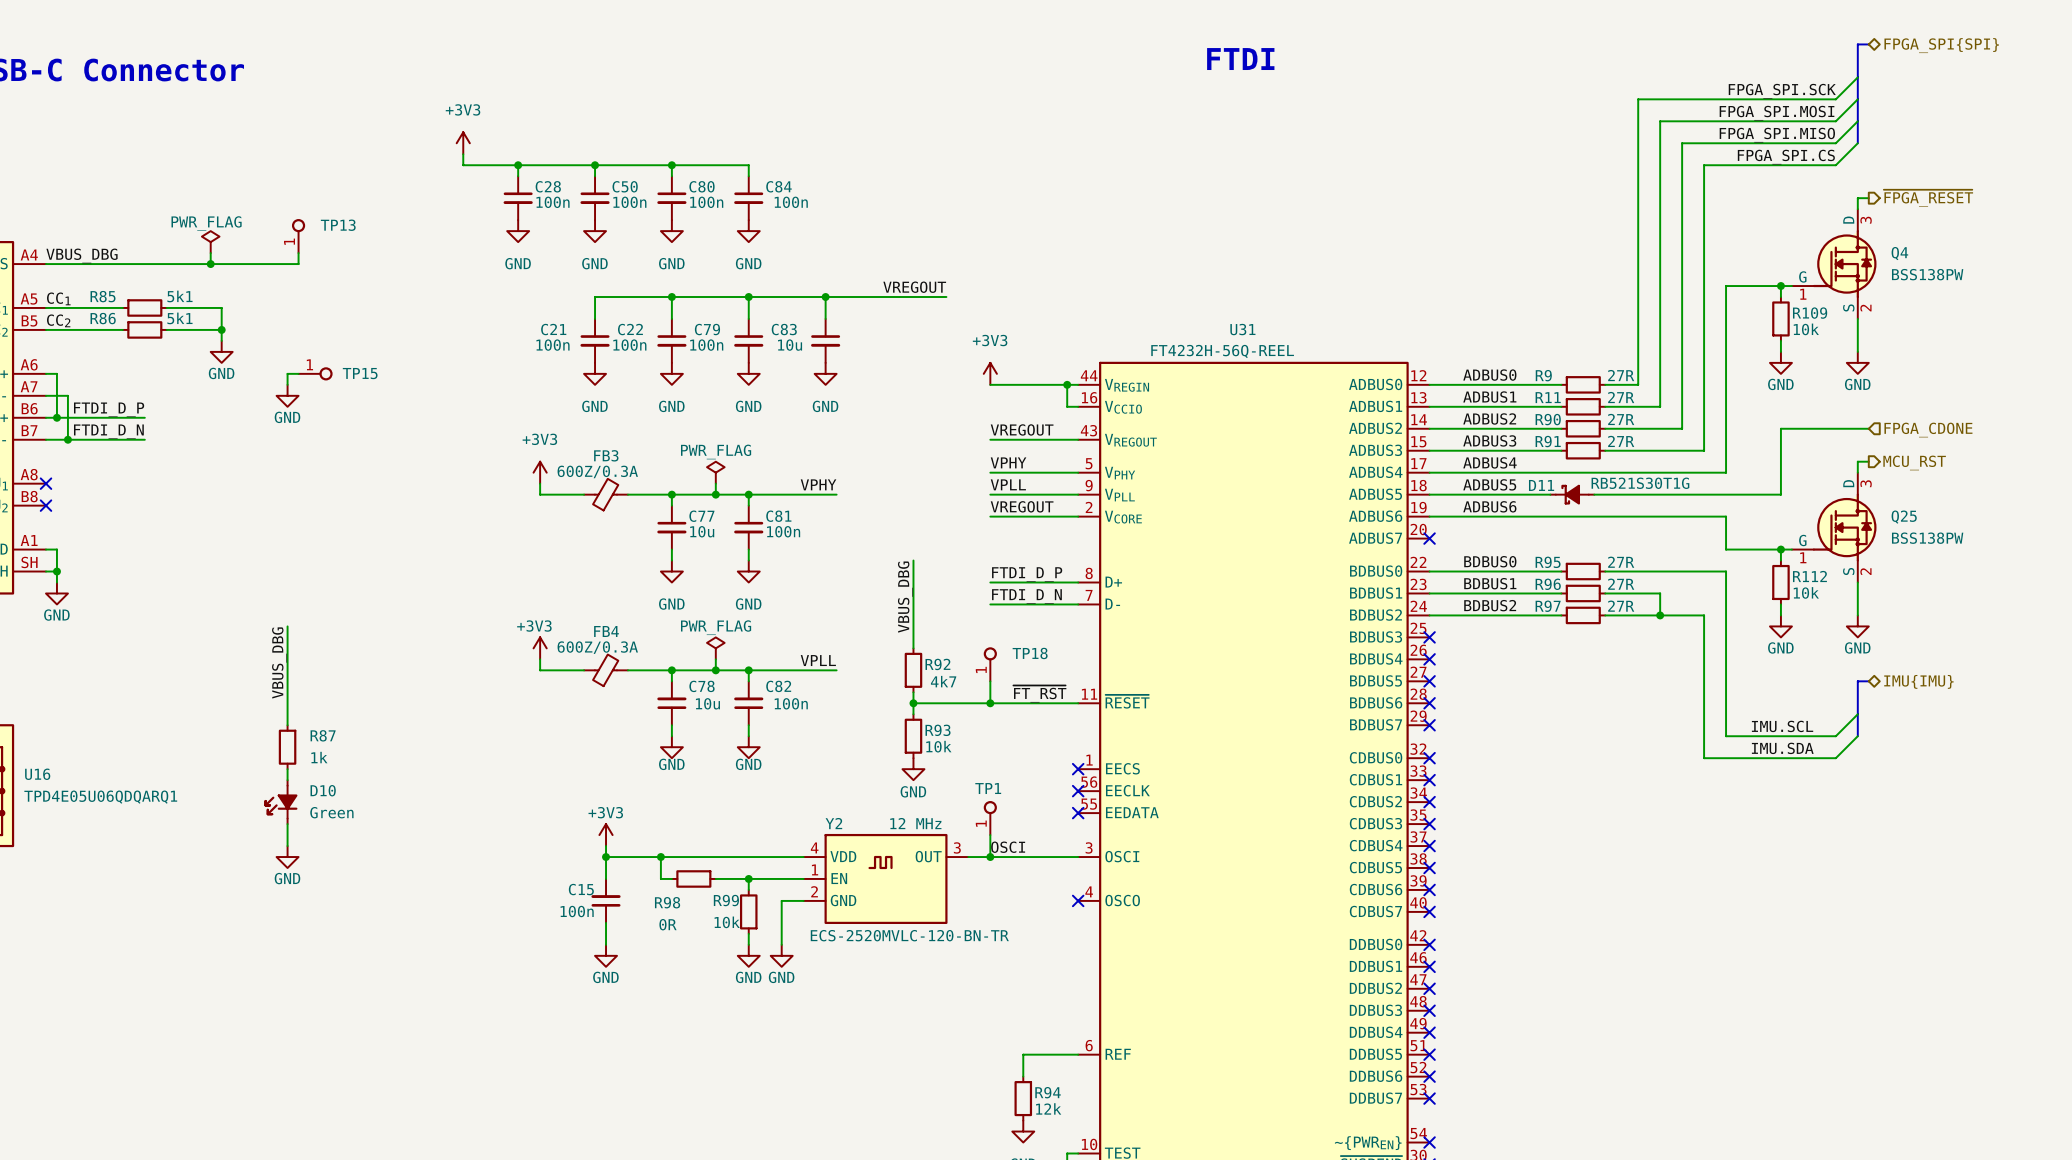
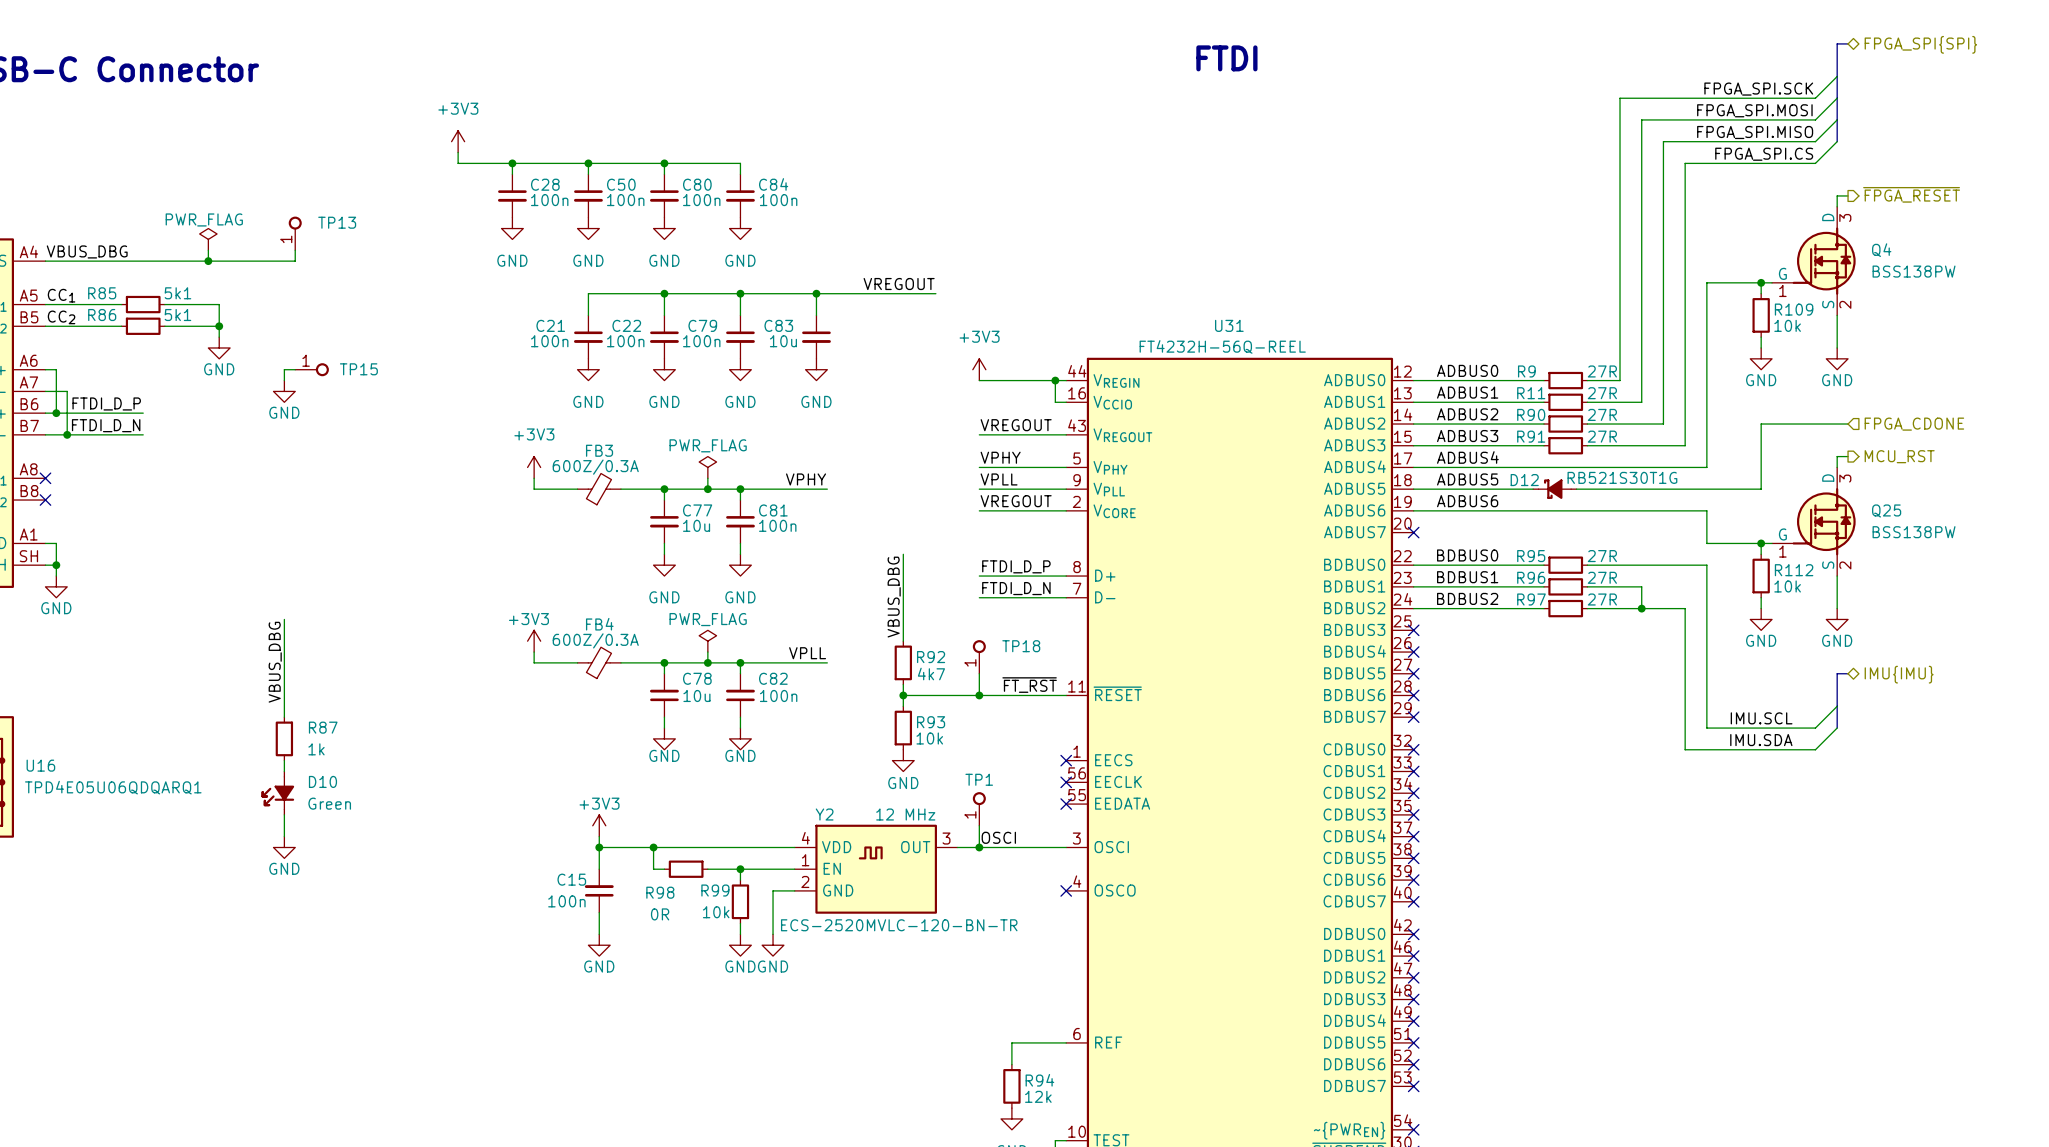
D11 name: D11 (1541, 485) -> D12 (1524, 480)

